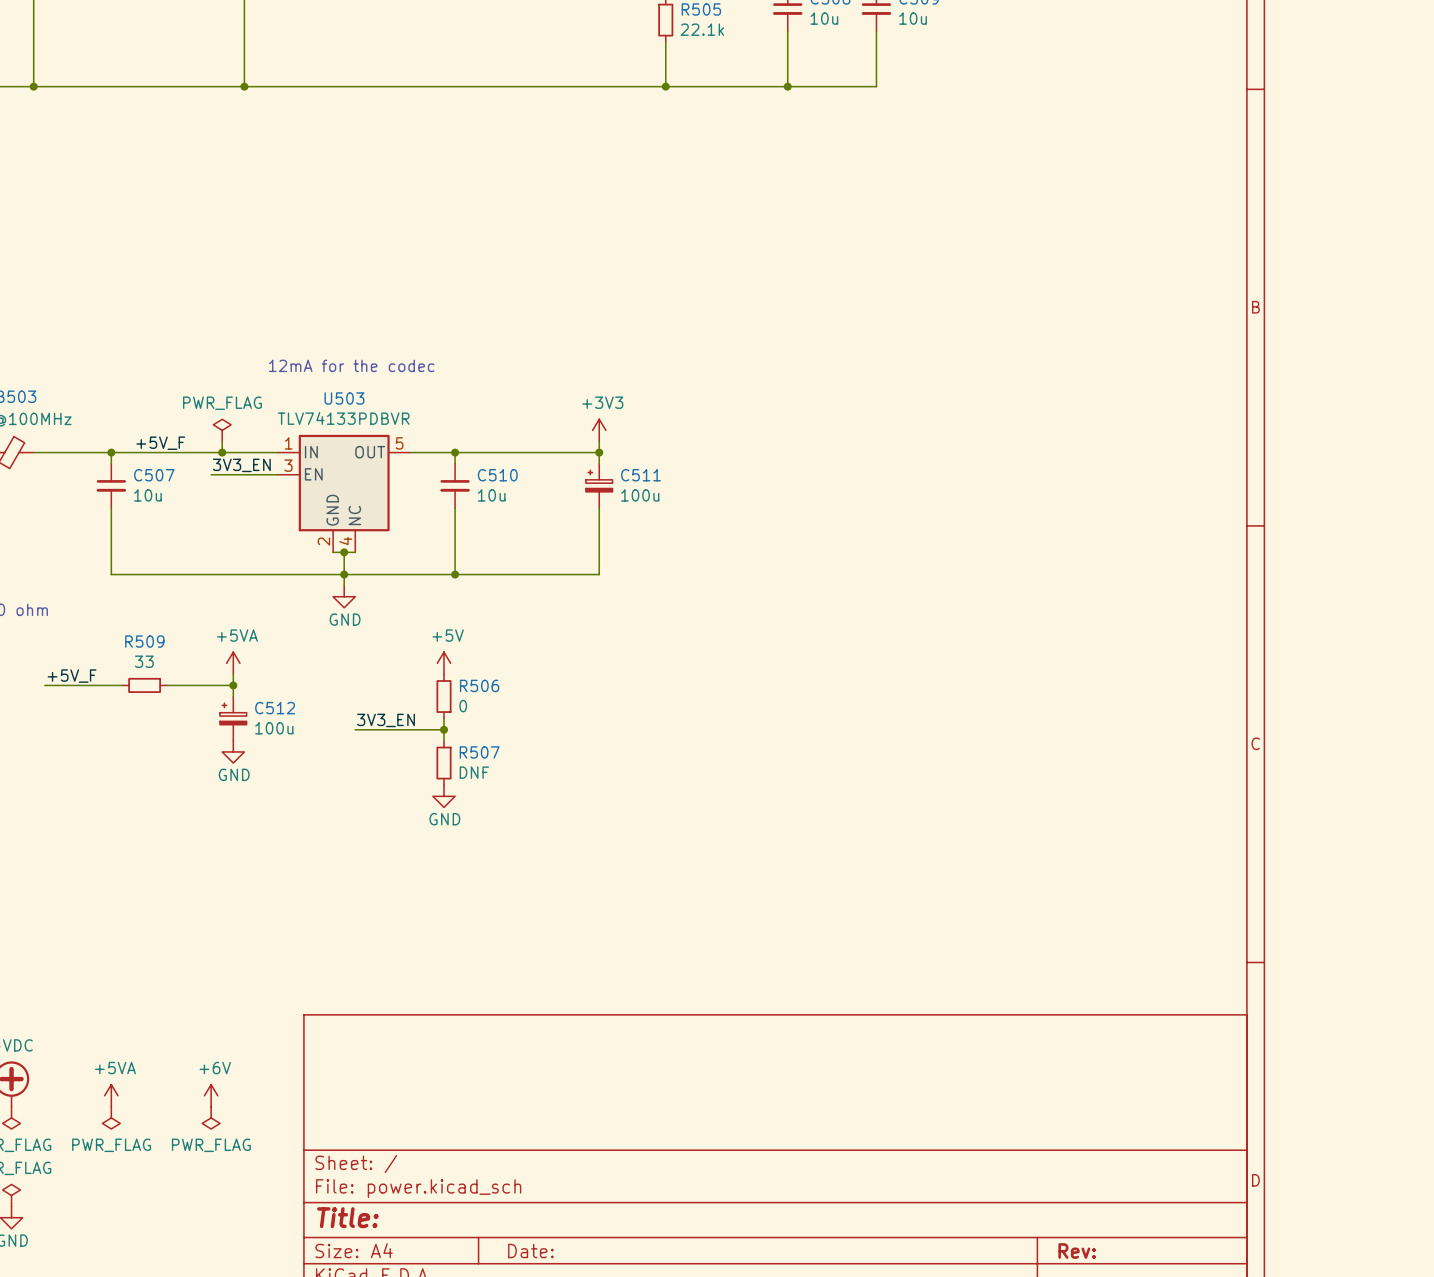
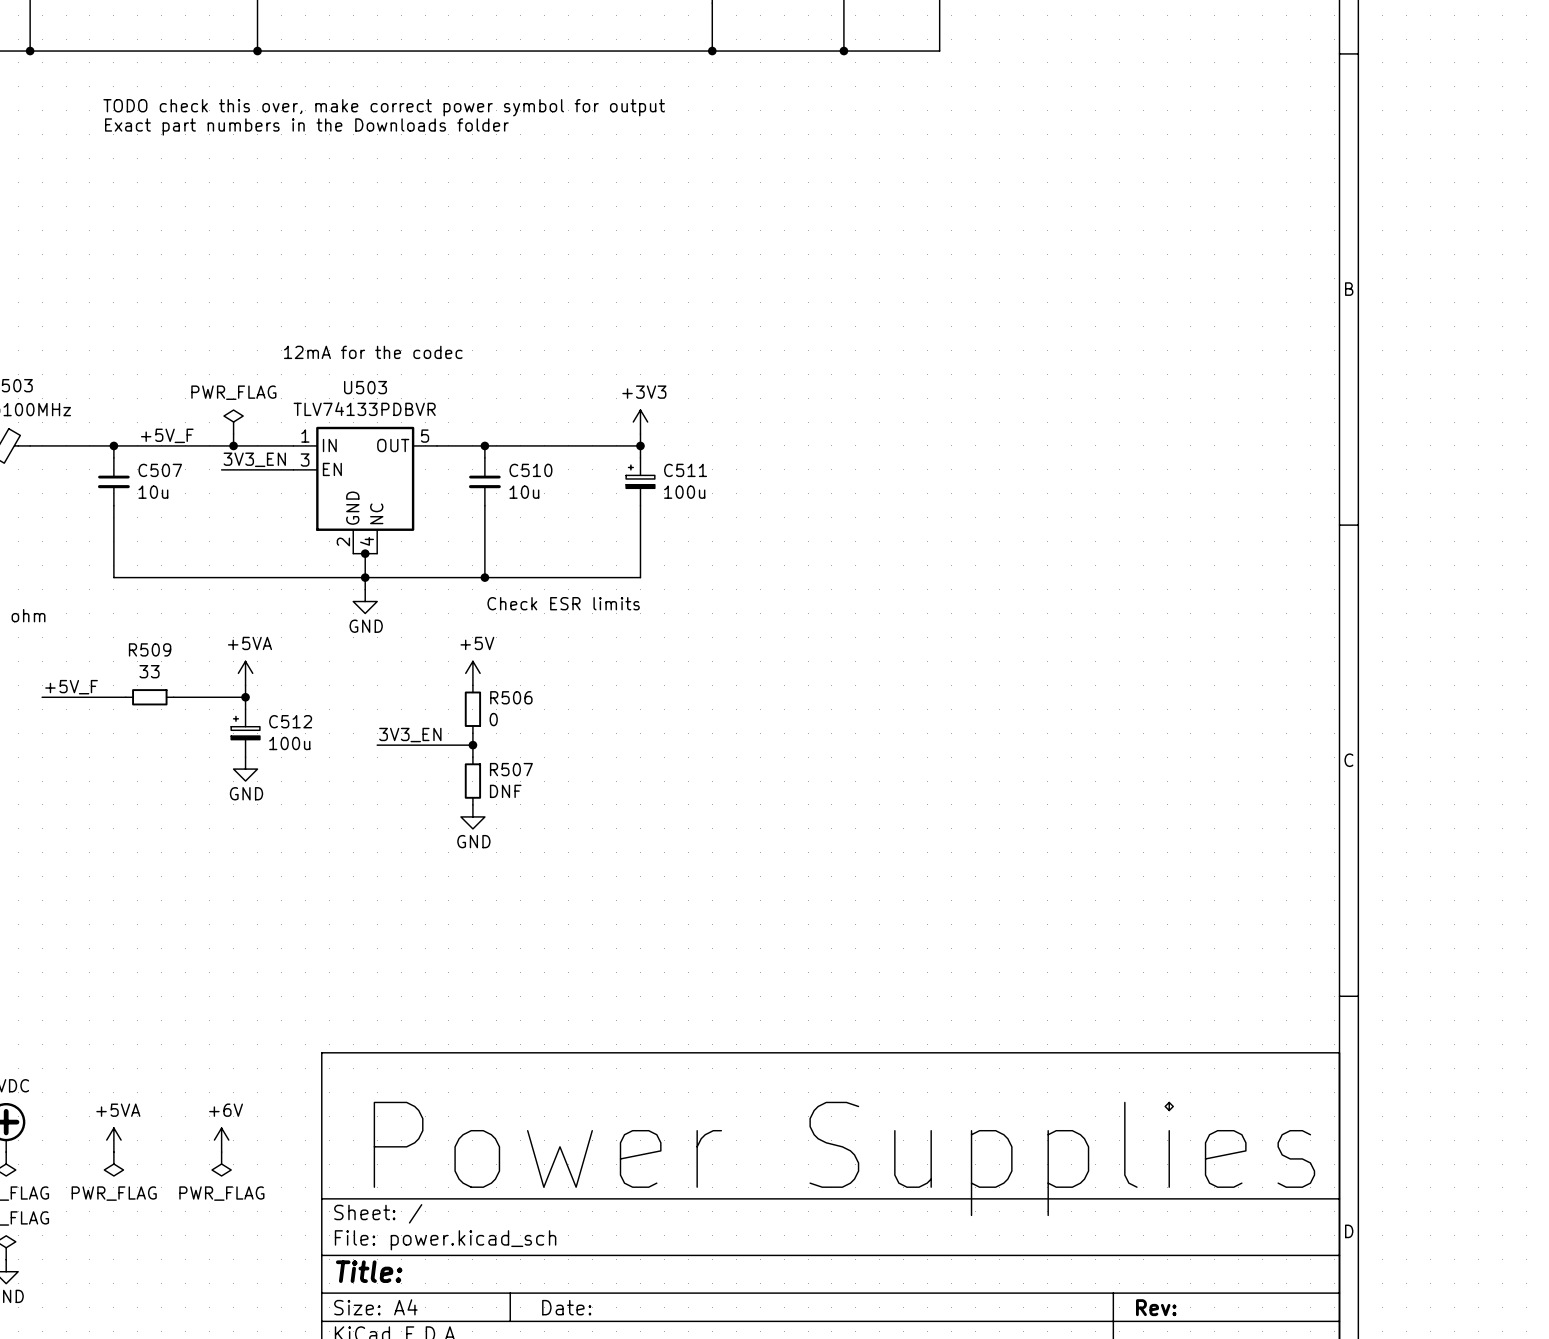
text: none -> TODO check this over, make correct power symbol for output (384, 107)
text: none -> Exact part numbers in the Downloads folder (306, 126)
text: none -> Check ESR limits (563, 603)
text: none -> Power Supplies (844, 1158)

